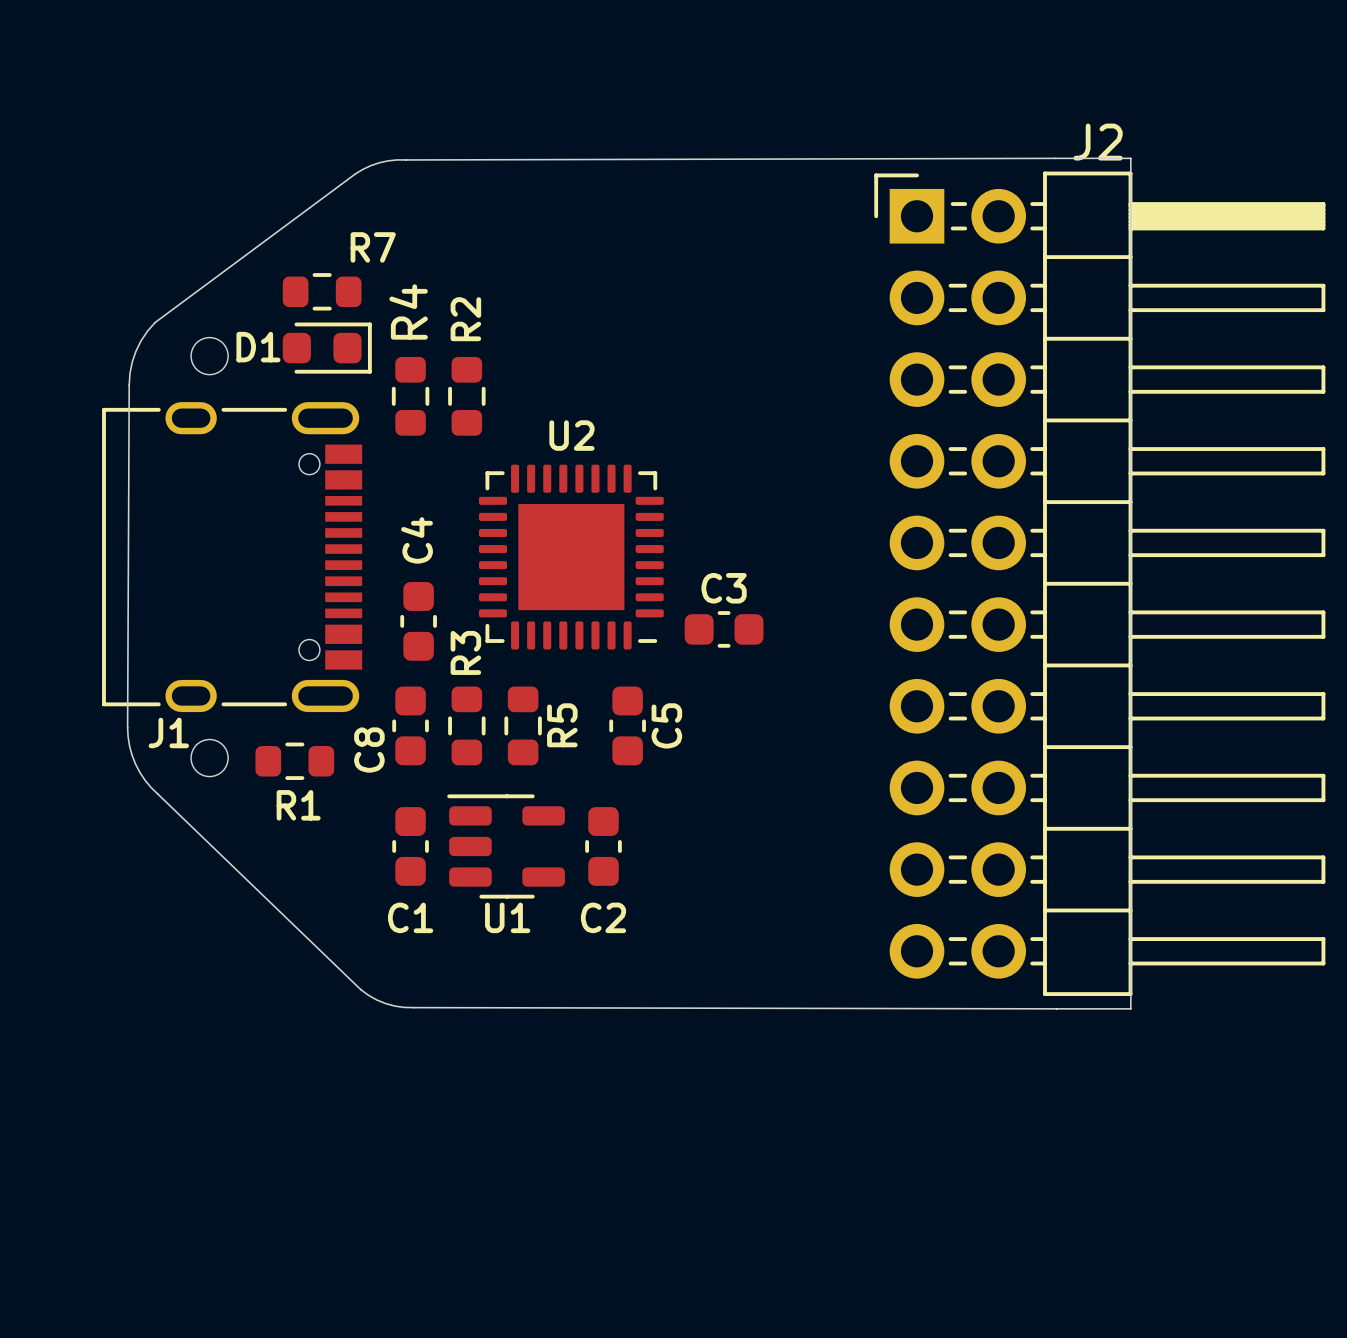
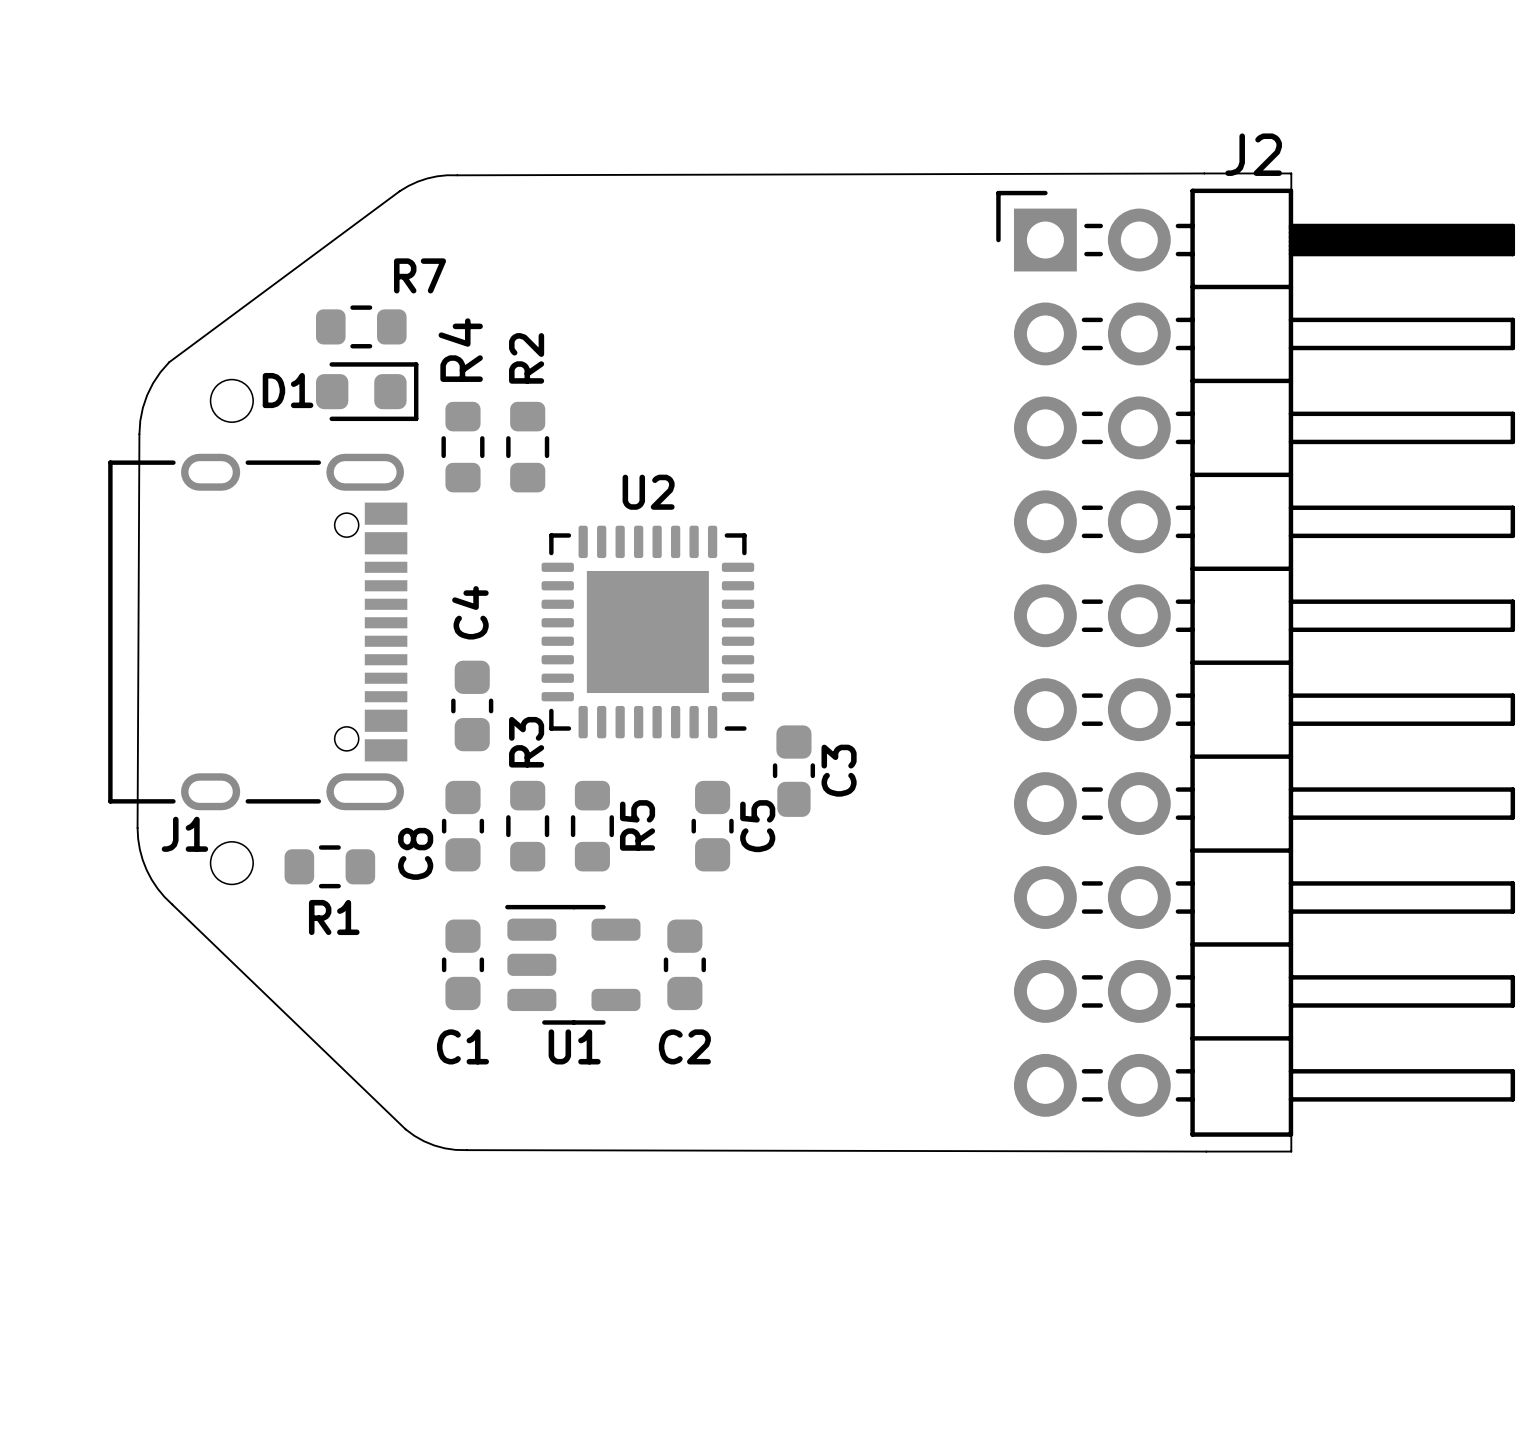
C3 footprint: [684, 611, 764, 648] -> [772, 725, 816, 817]

